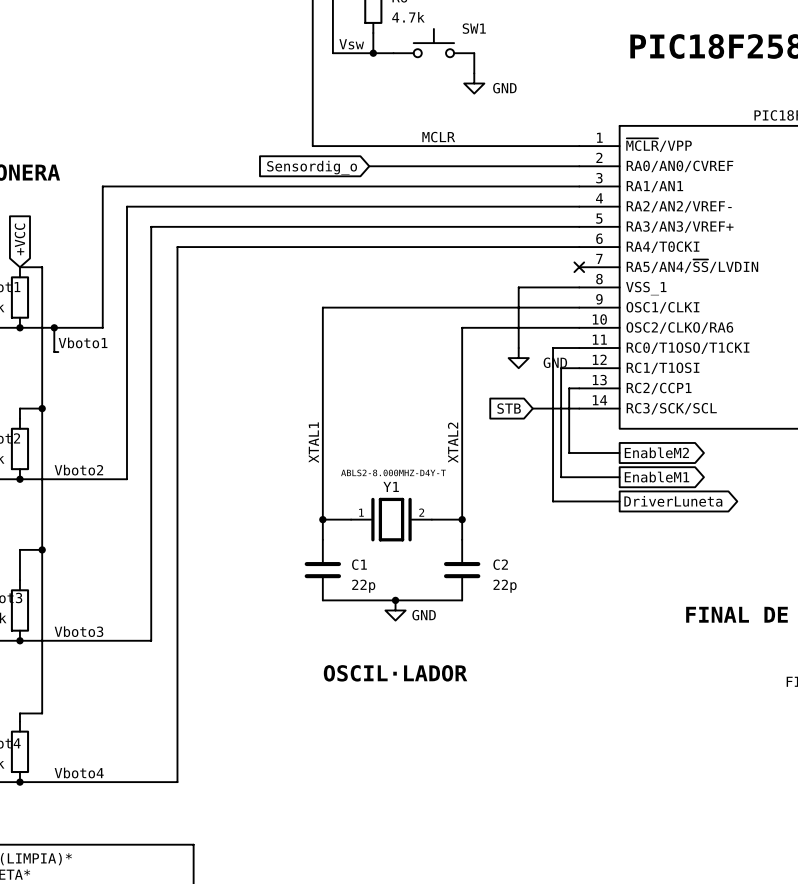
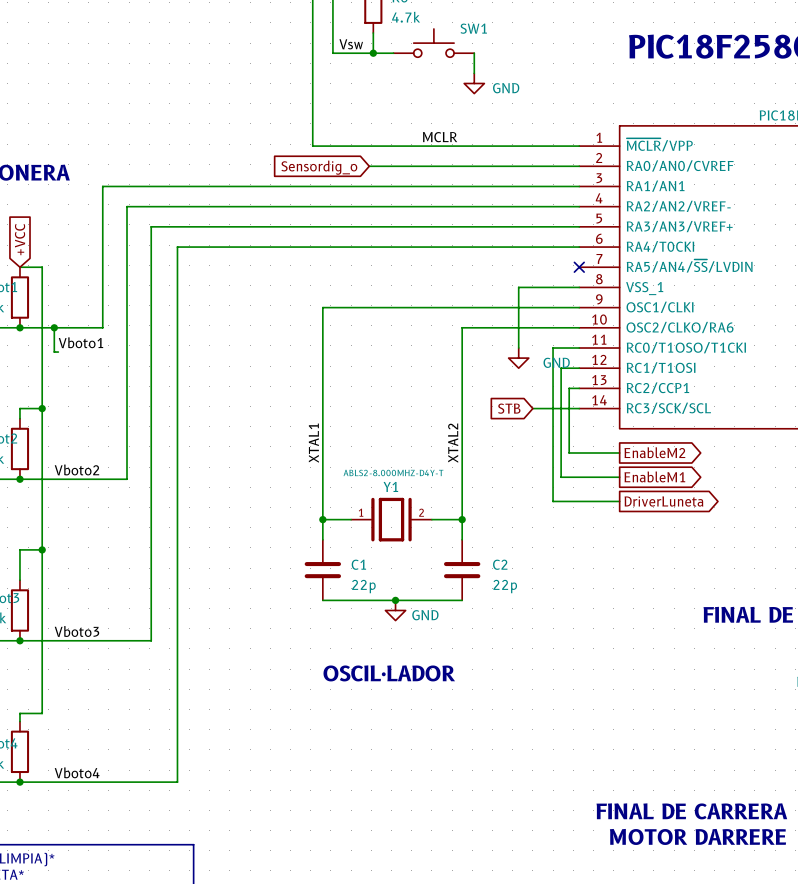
text: none -> FINAL DE CARRERA (691, 811)
text: none -> MOTOR DARRERE (697, 836)

